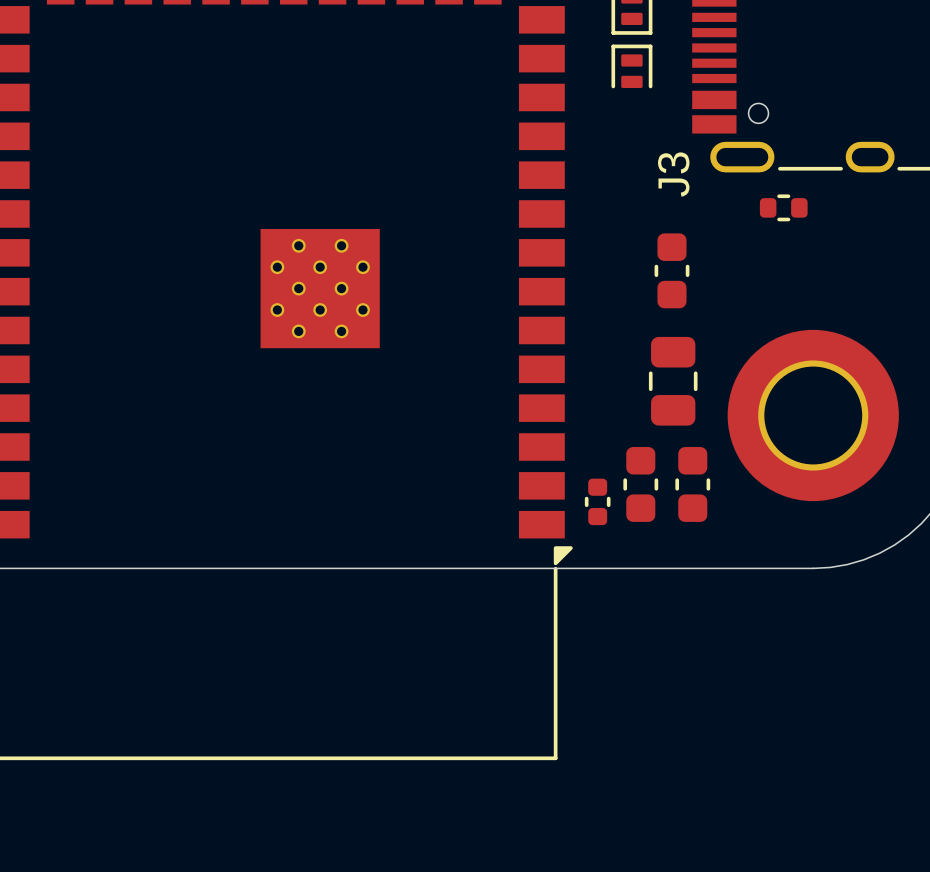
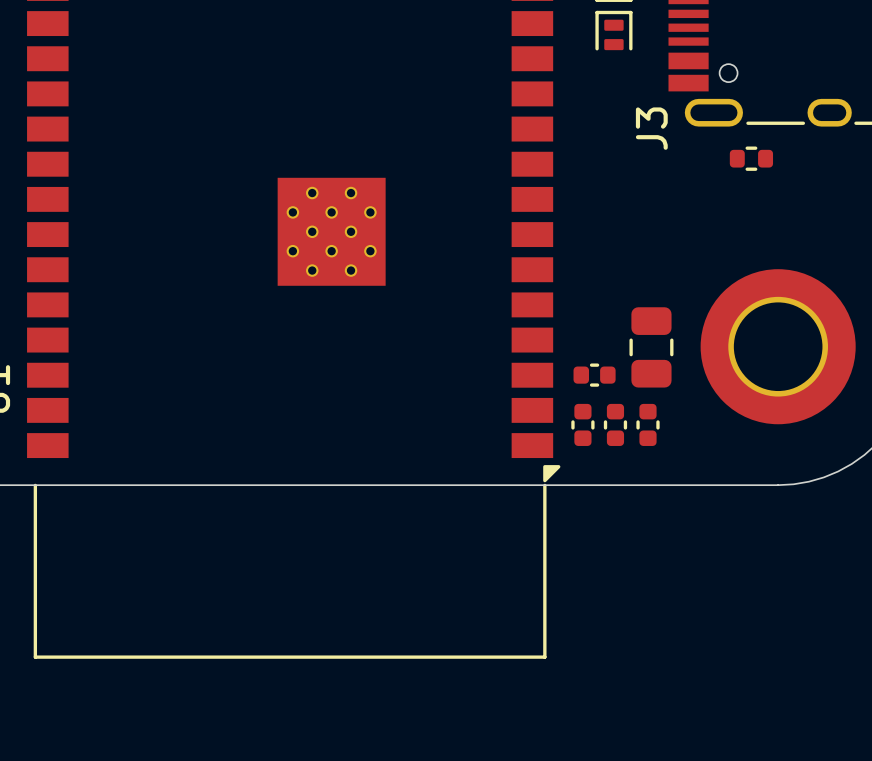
part: (671, 270) -> none
part position: (673, 381) -> (651, 347)
part: none -> (594, 375)
part: (640, 484) -> none
part: (692, 484) -> none
part: none -> (615, 424)
part: none -> (648, 424)

